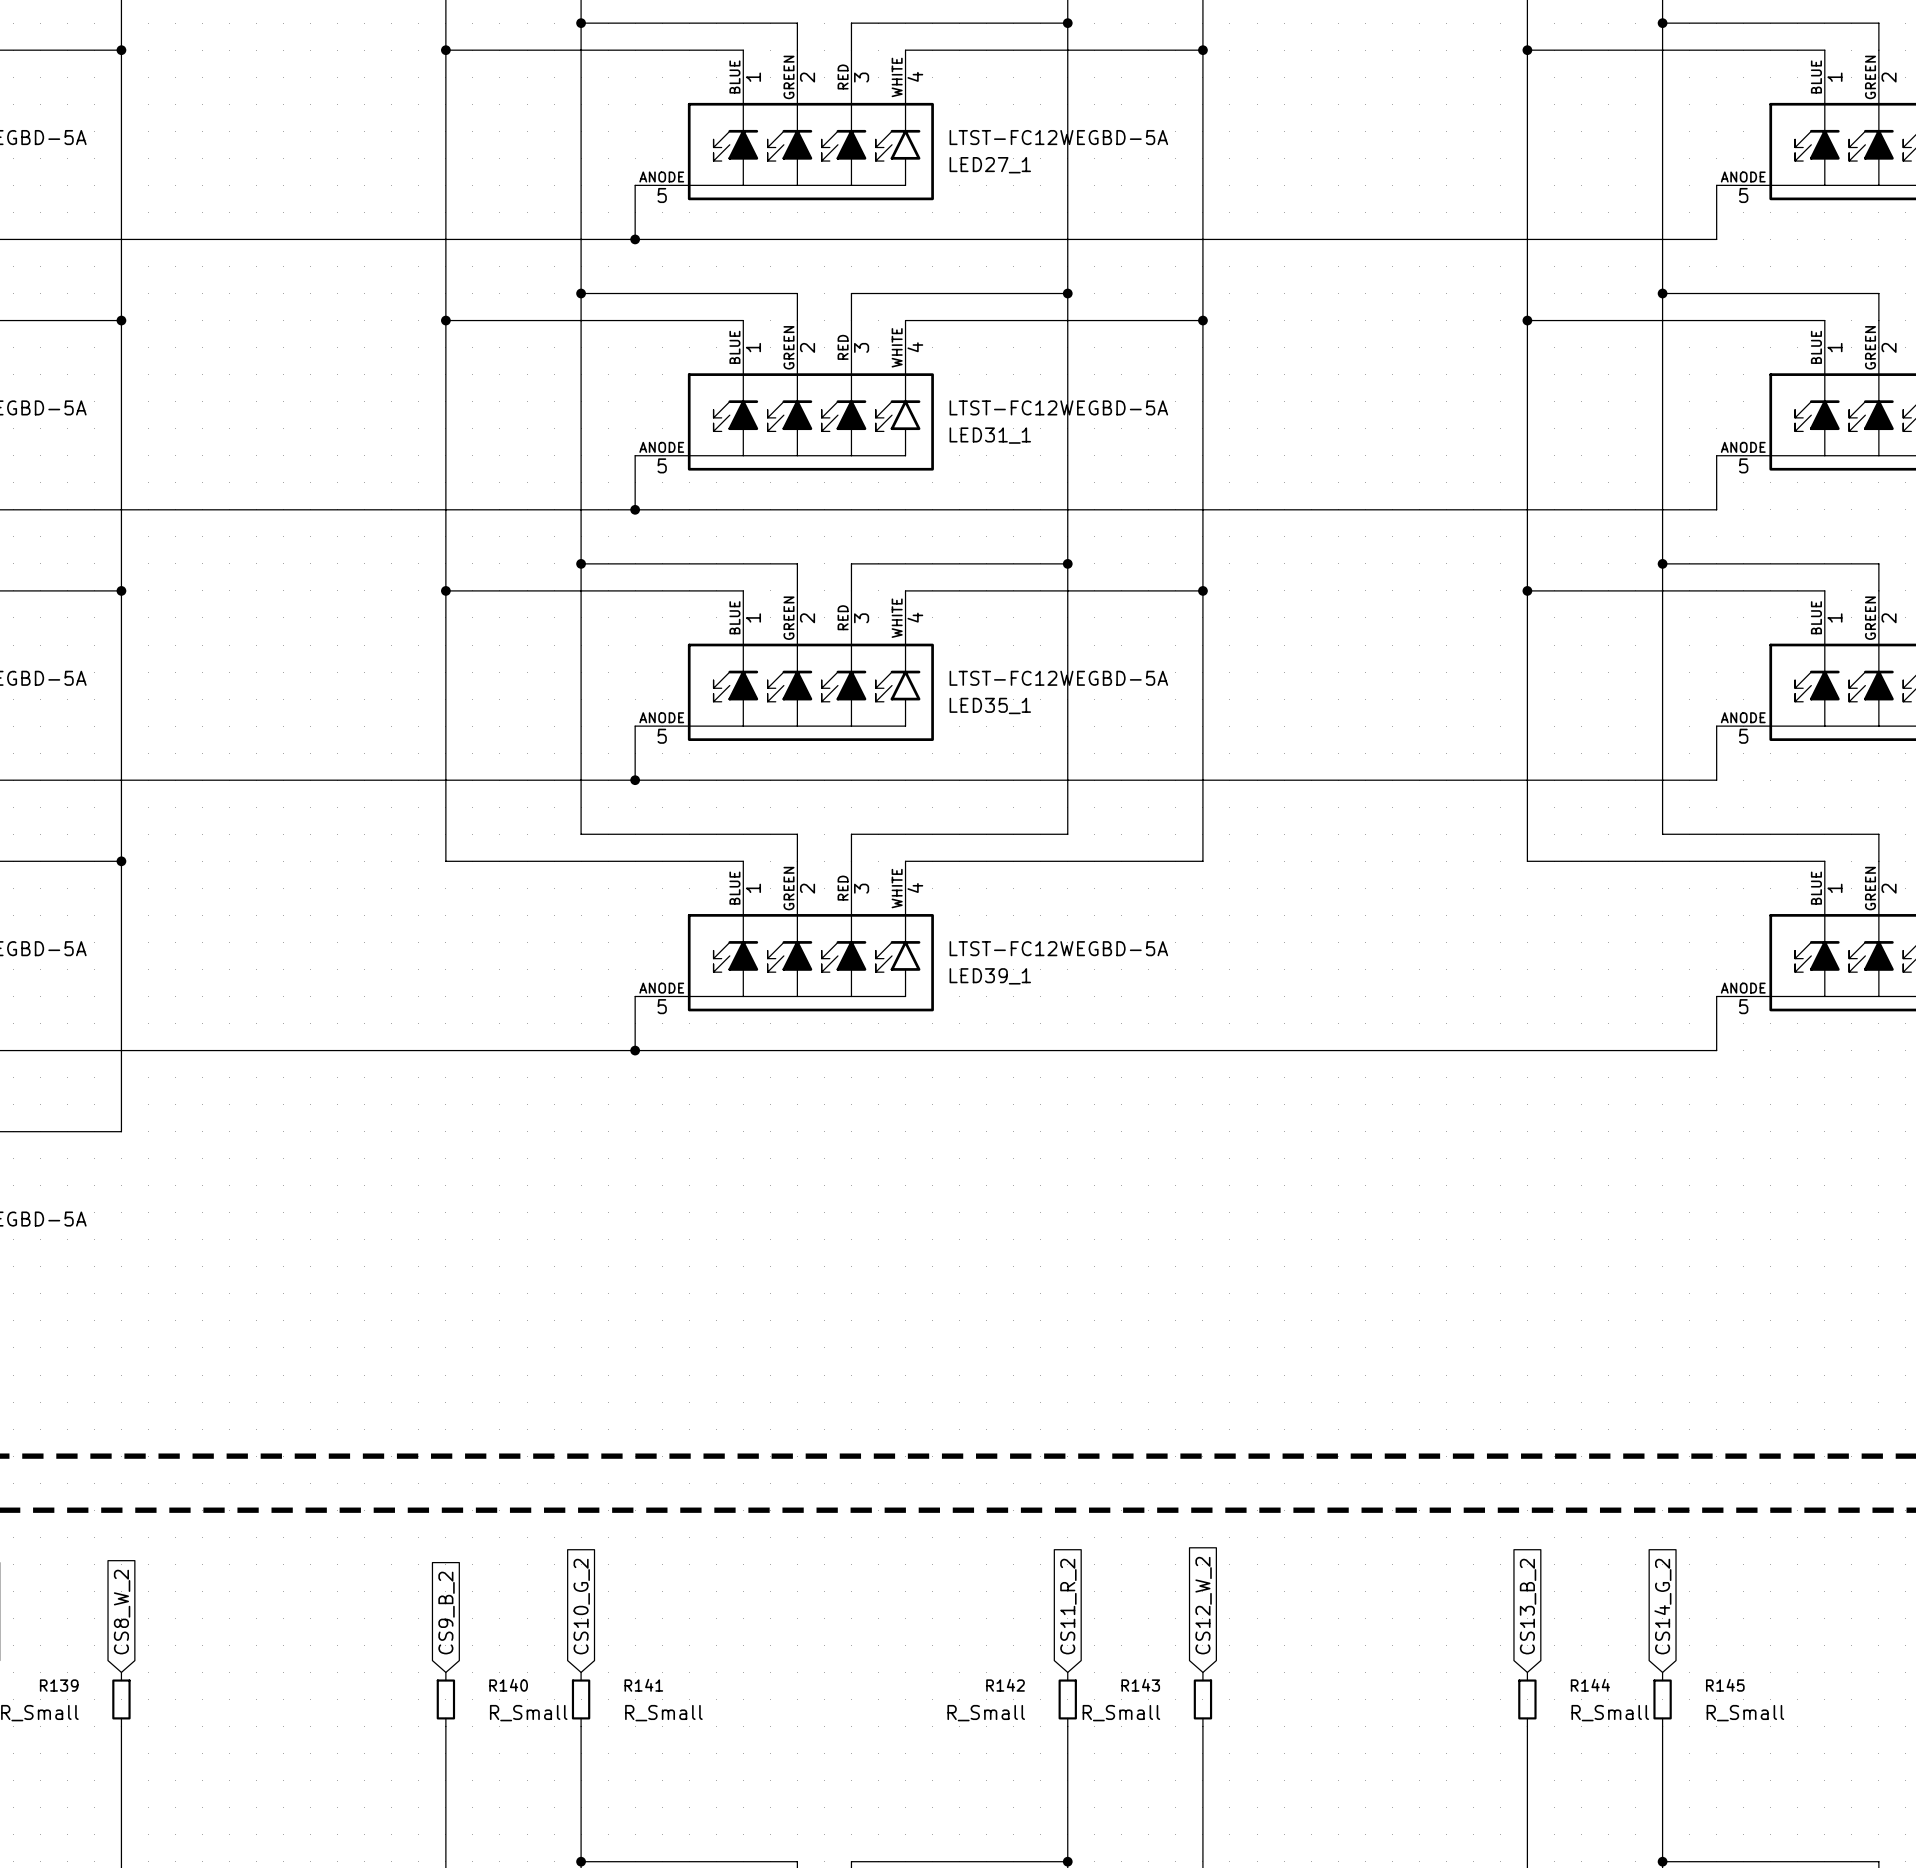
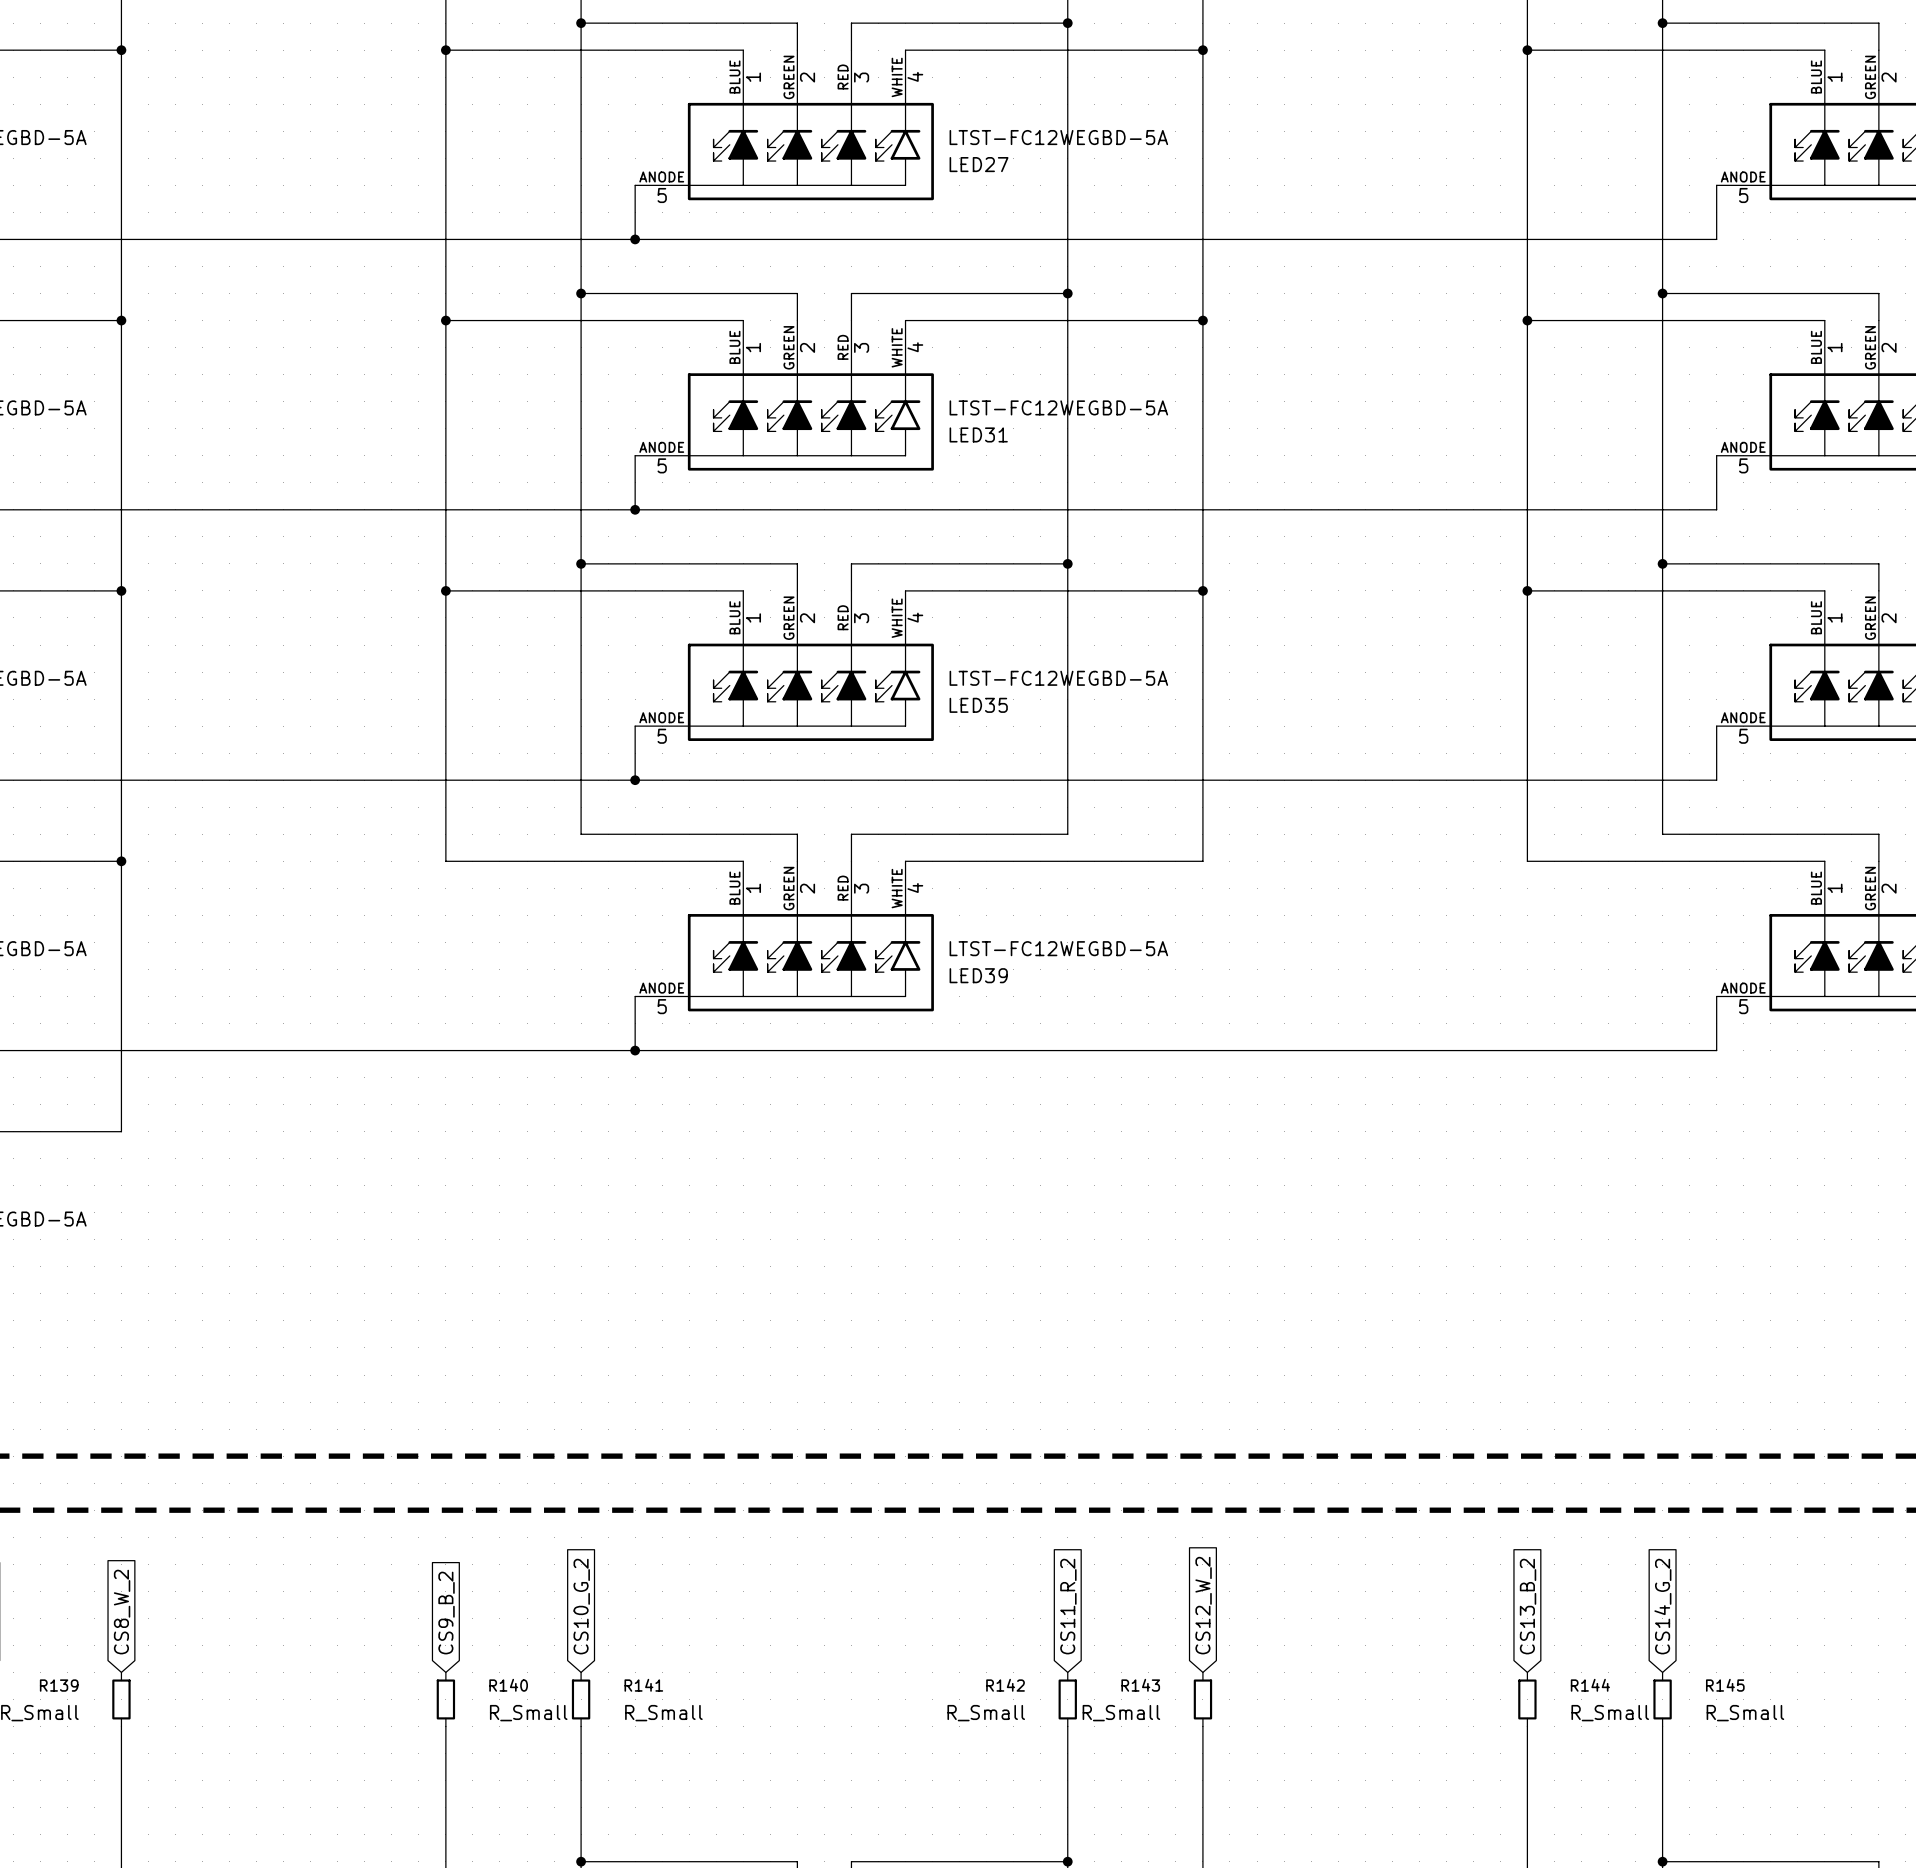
LED27_1 name: LED27_1 (990, 165) -> LED27 (979, 164)
LED31_1 name: LED31_1 (990, 435) -> LED31 (978, 434)
LED35_1 name: LED35_1 (990, 705) -> LED35 (978, 705)
LED39_1 name: LED39_1 (990, 976) -> LED39 (978, 975)

